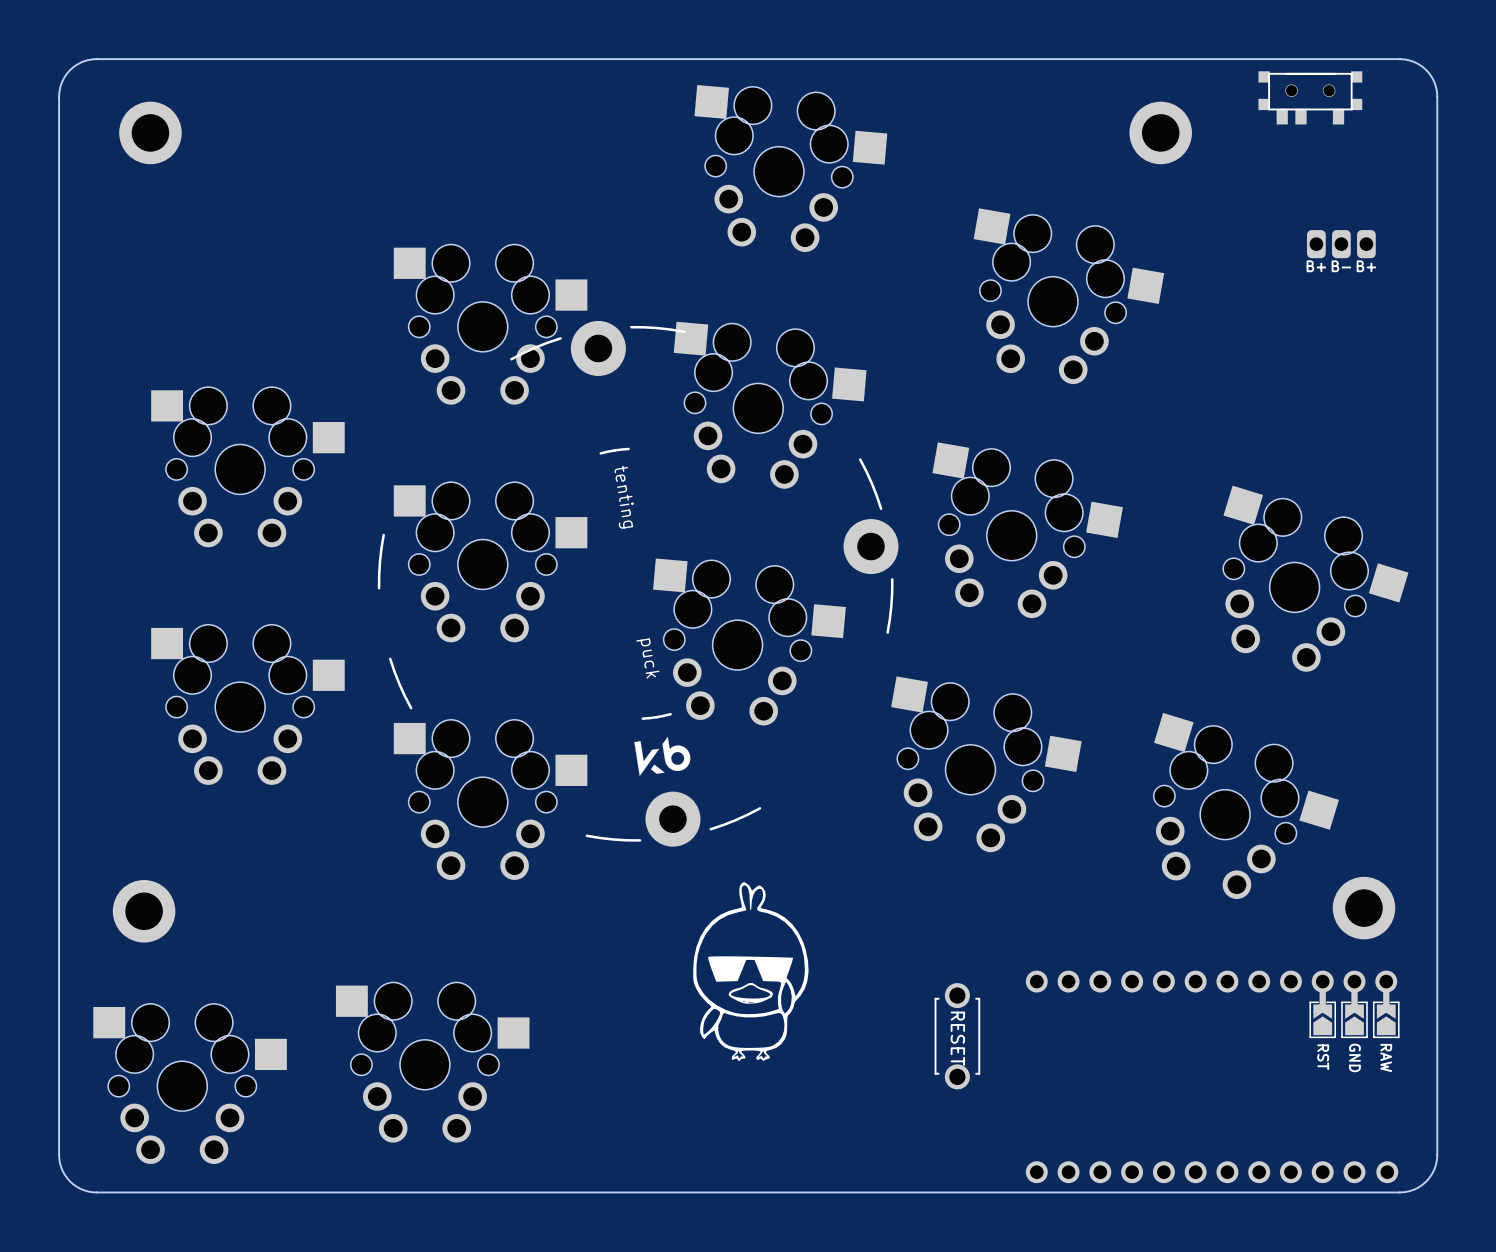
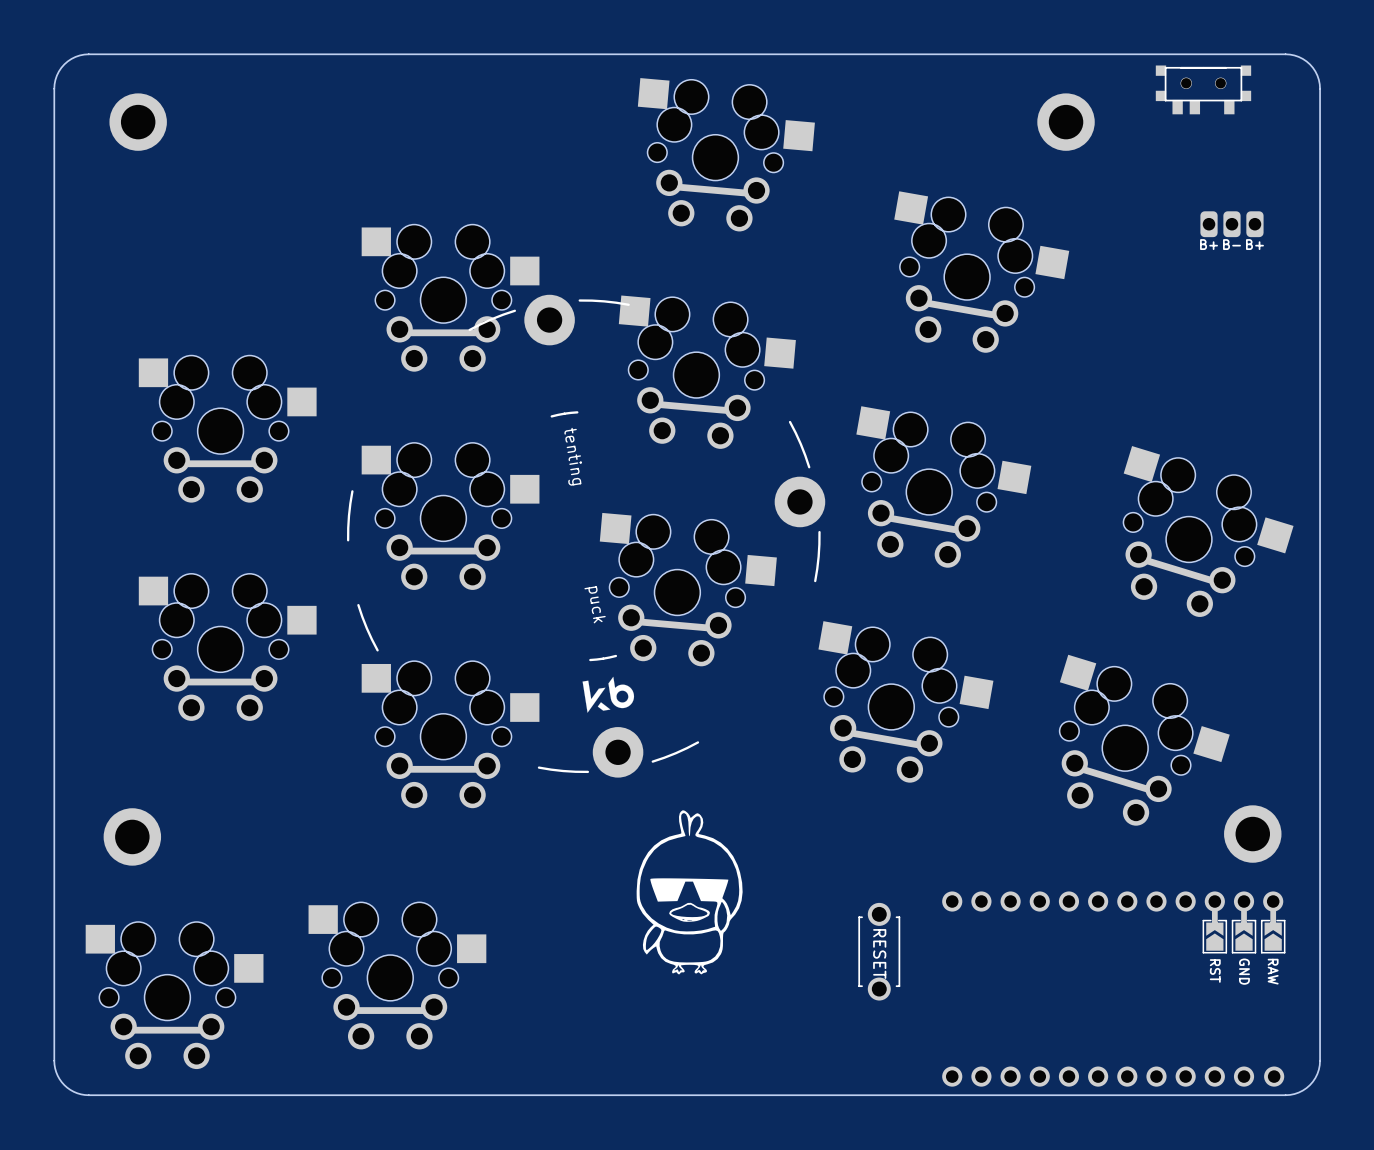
part footprint: [694, 85, 888, 253] -> [637, 78, 815, 232]
part footprint: [973, 208, 1165, 385] -> [894, 191, 1070, 353]
part footprint: [393, 244, 588, 405] -> [361, 224, 540, 372]
part footprint: [673, 321, 867, 489] -> [618, 295, 796, 449]
part footprint: [151, 387, 345, 548] -> [138, 355, 317, 503]
part footprint: [932, 442, 1123, 619] -> [856, 406, 1032, 568]
part footprint: [393, 482, 588, 643] -> [361, 442, 540, 590]
part footprint: [1223, 485, 1409, 672] -> [1123, 446, 1294, 617]
part footprint: [653, 558, 846, 726] -> [599, 512, 777, 667]
part footprint: [151, 624, 345, 785] -> [138, 573, 317, 721]
part footprint: [891, 676, 1082, 853] -> [818, 621, 994, 783]
part footprint: [1153, 712, 1339, 900] -> [1059, 654, 1230, 826]
part footprint: [393, 719, 588, 880] -> [361, 661, 540, 809]
part footprint: [335, 982, 530, 1143] -> [308, 902, 487, 1050]
part footprint: [93, 1003, 287, 1165] -> [85, 921, 264, 1070]

